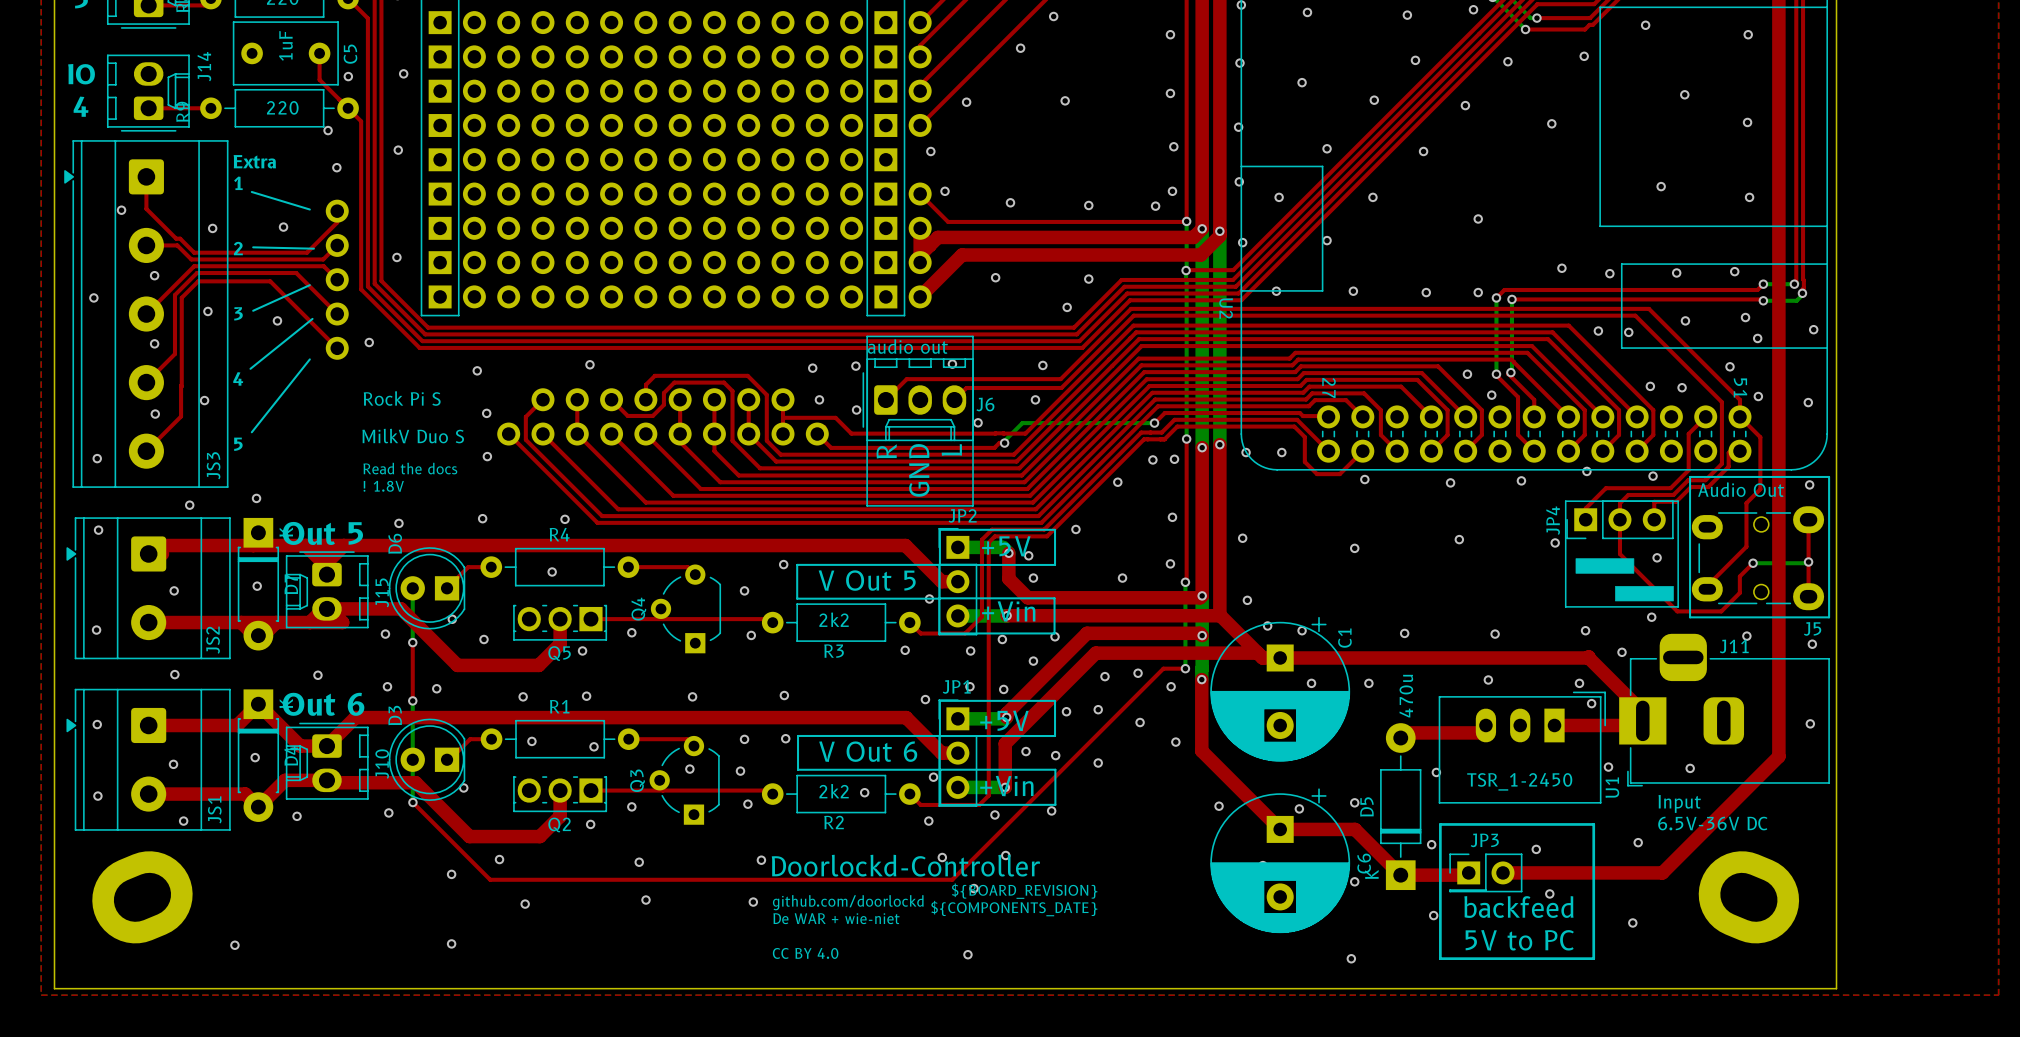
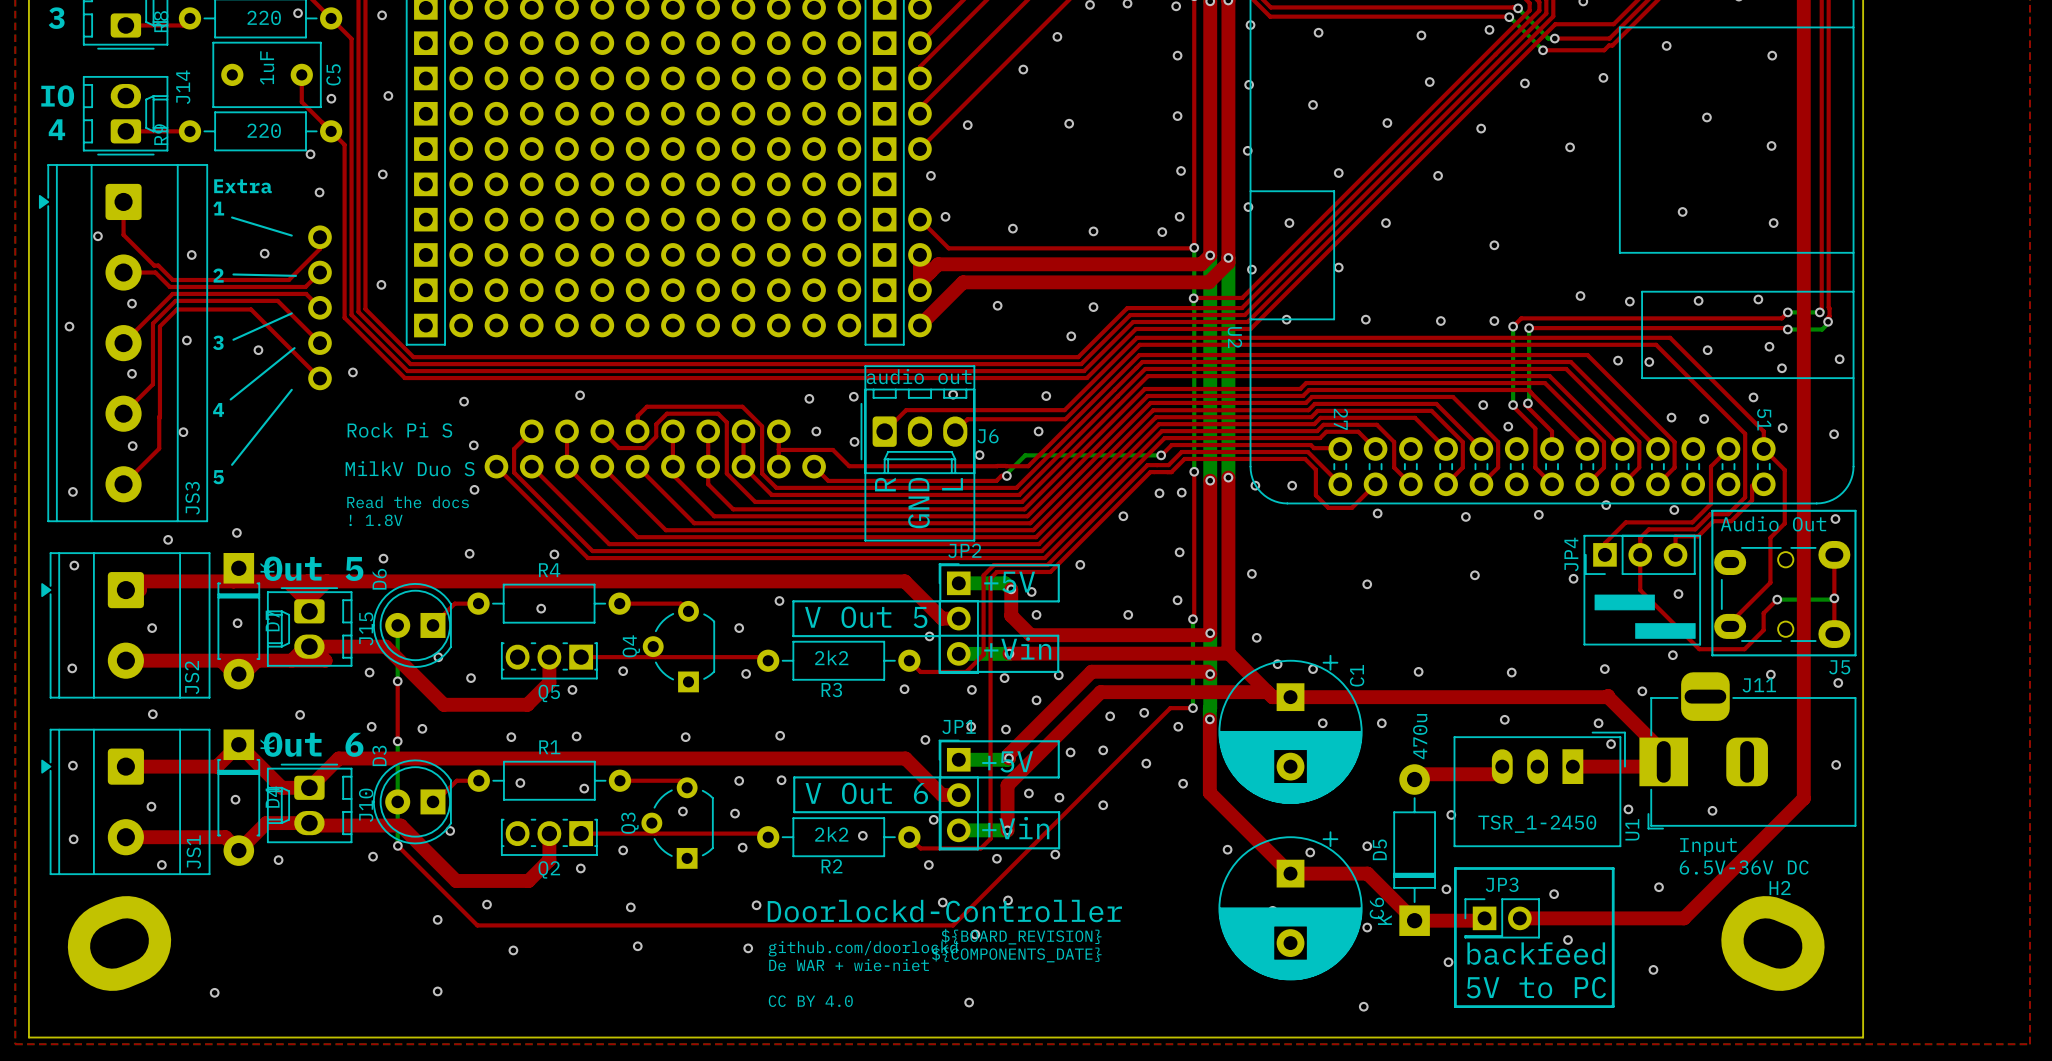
H2 name: none -> H2 (1780, 887)

